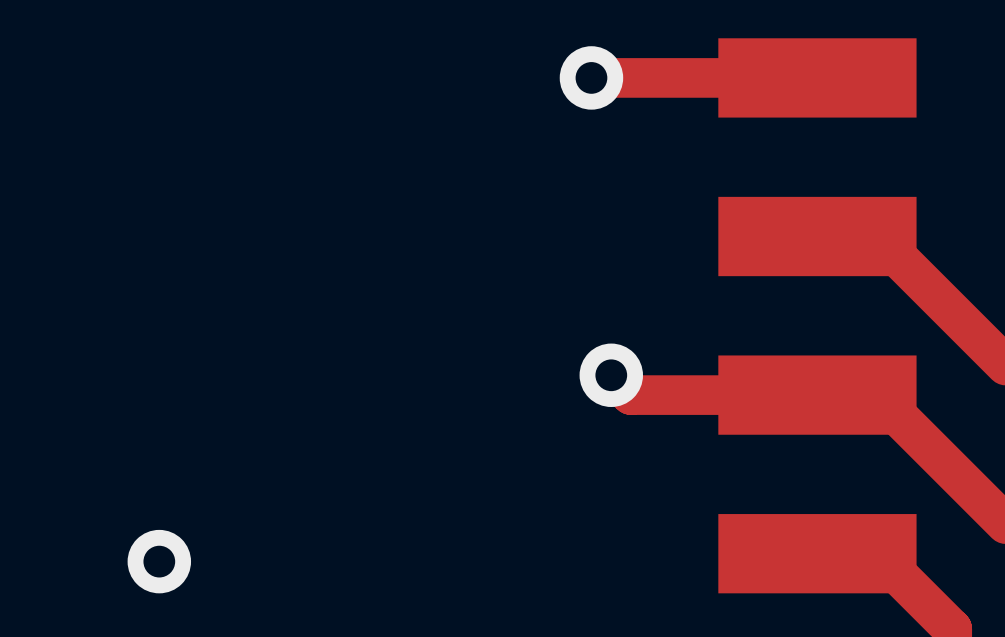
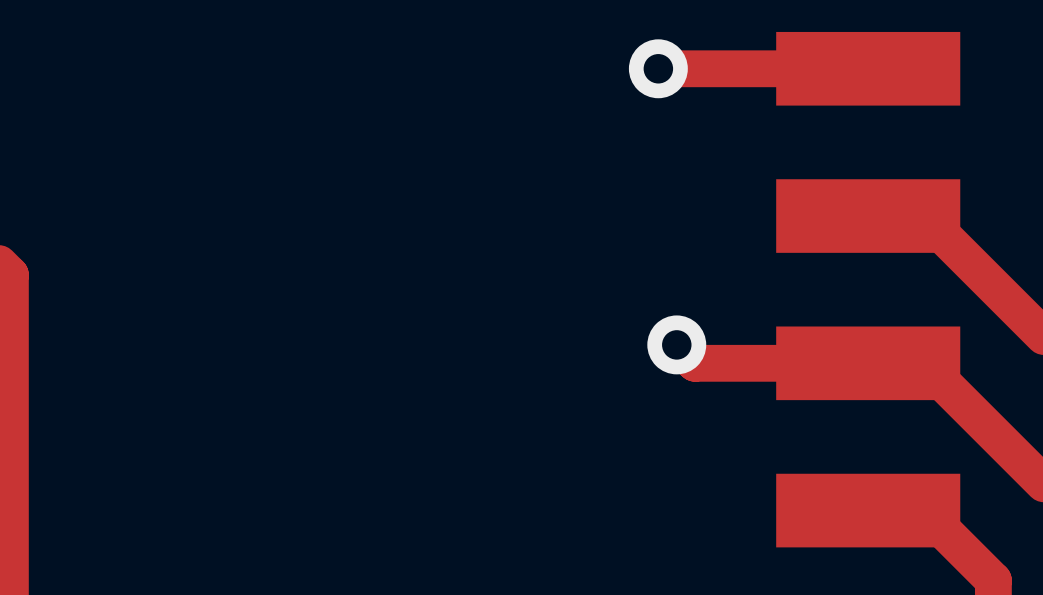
via: (159, 561) -> none

